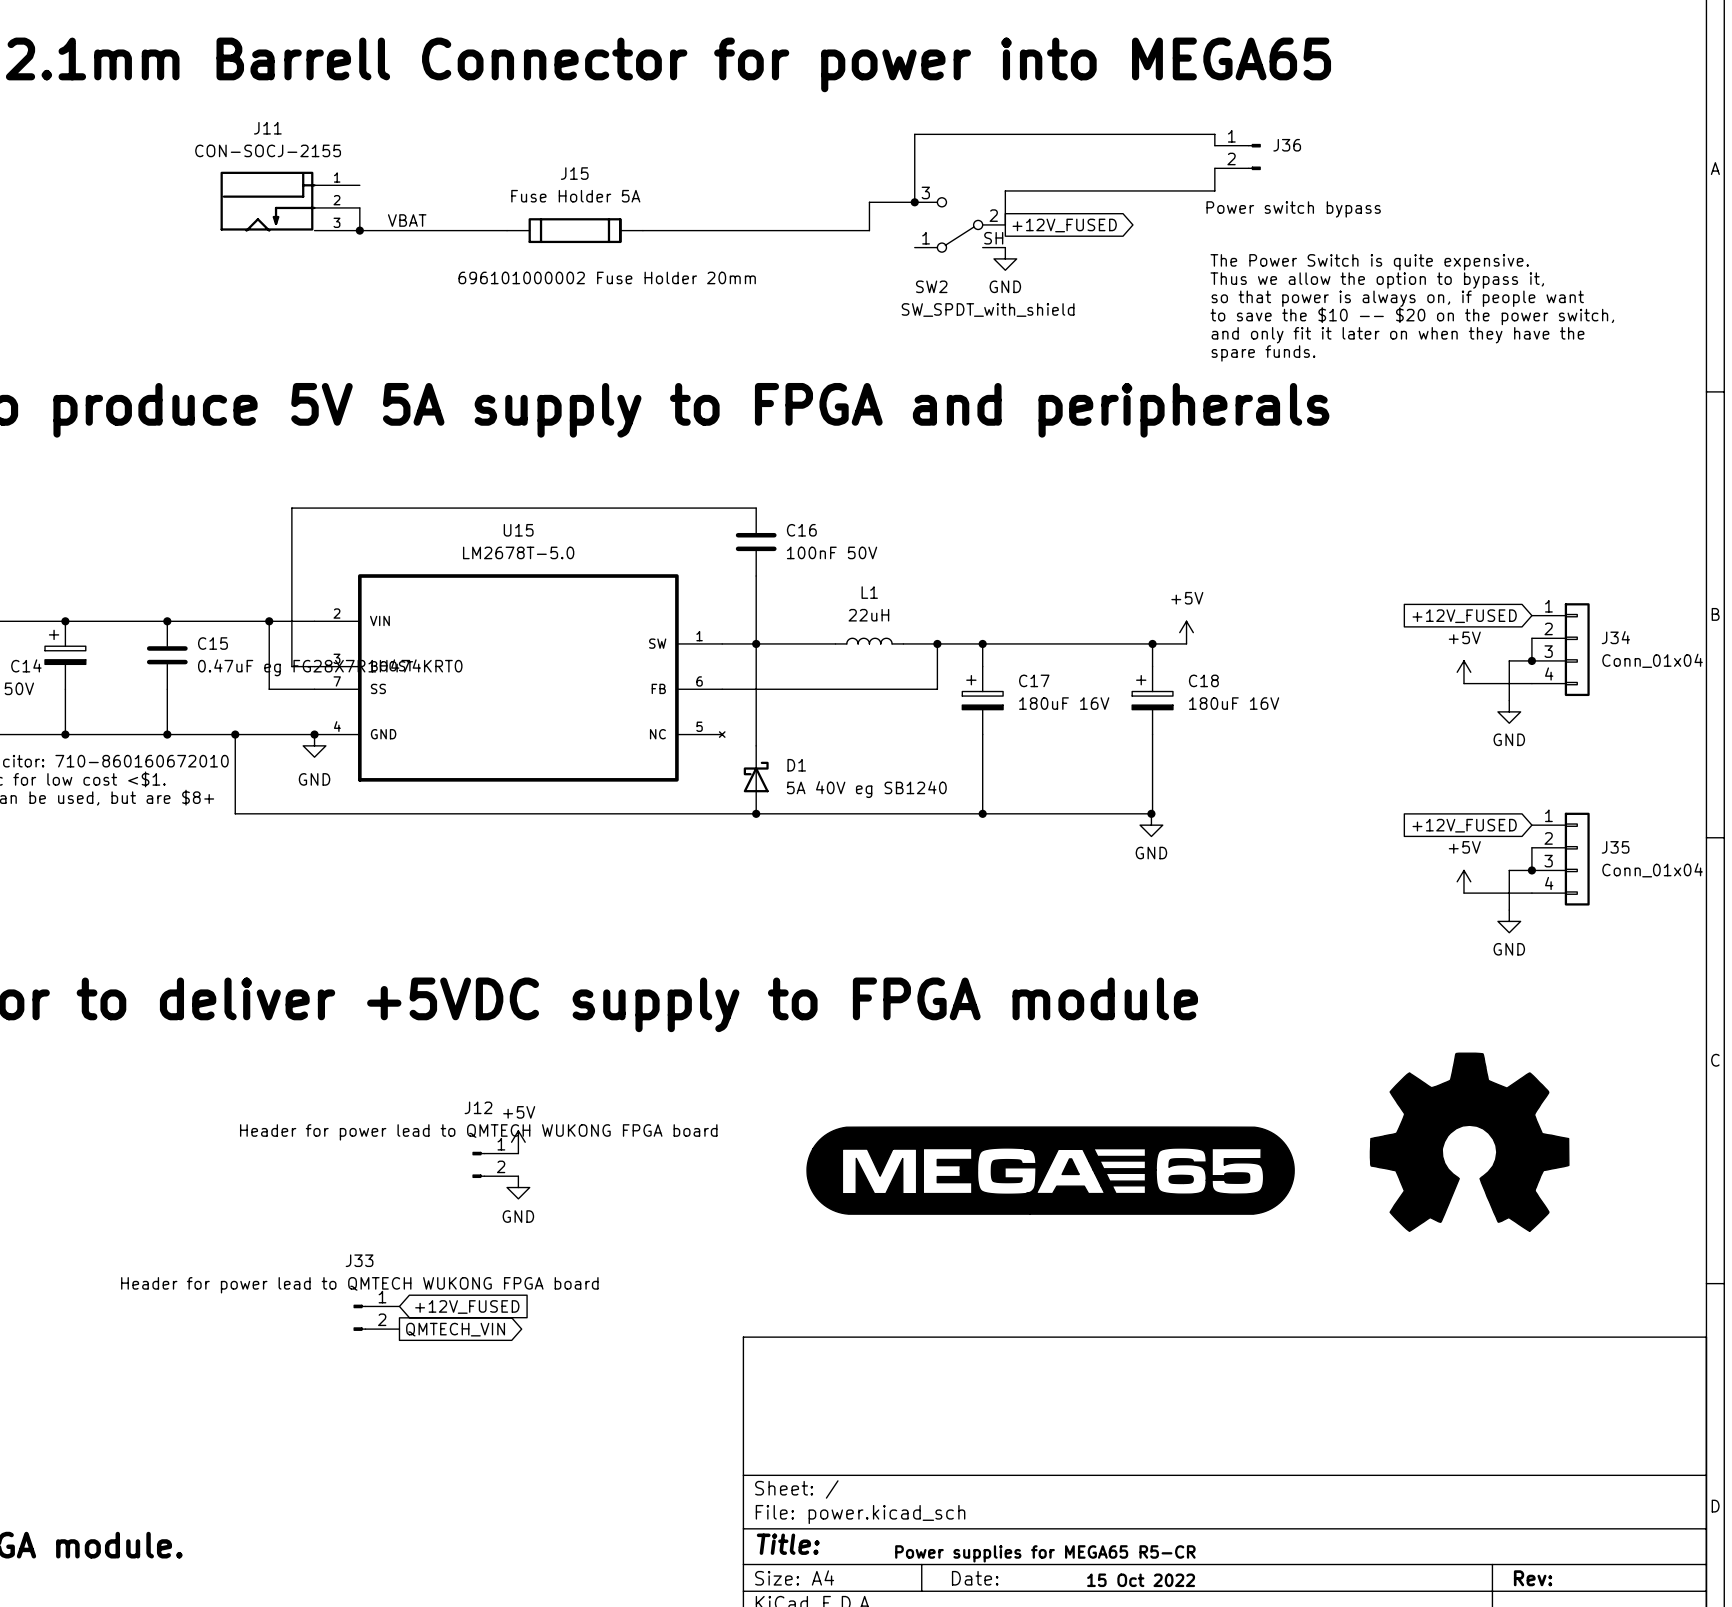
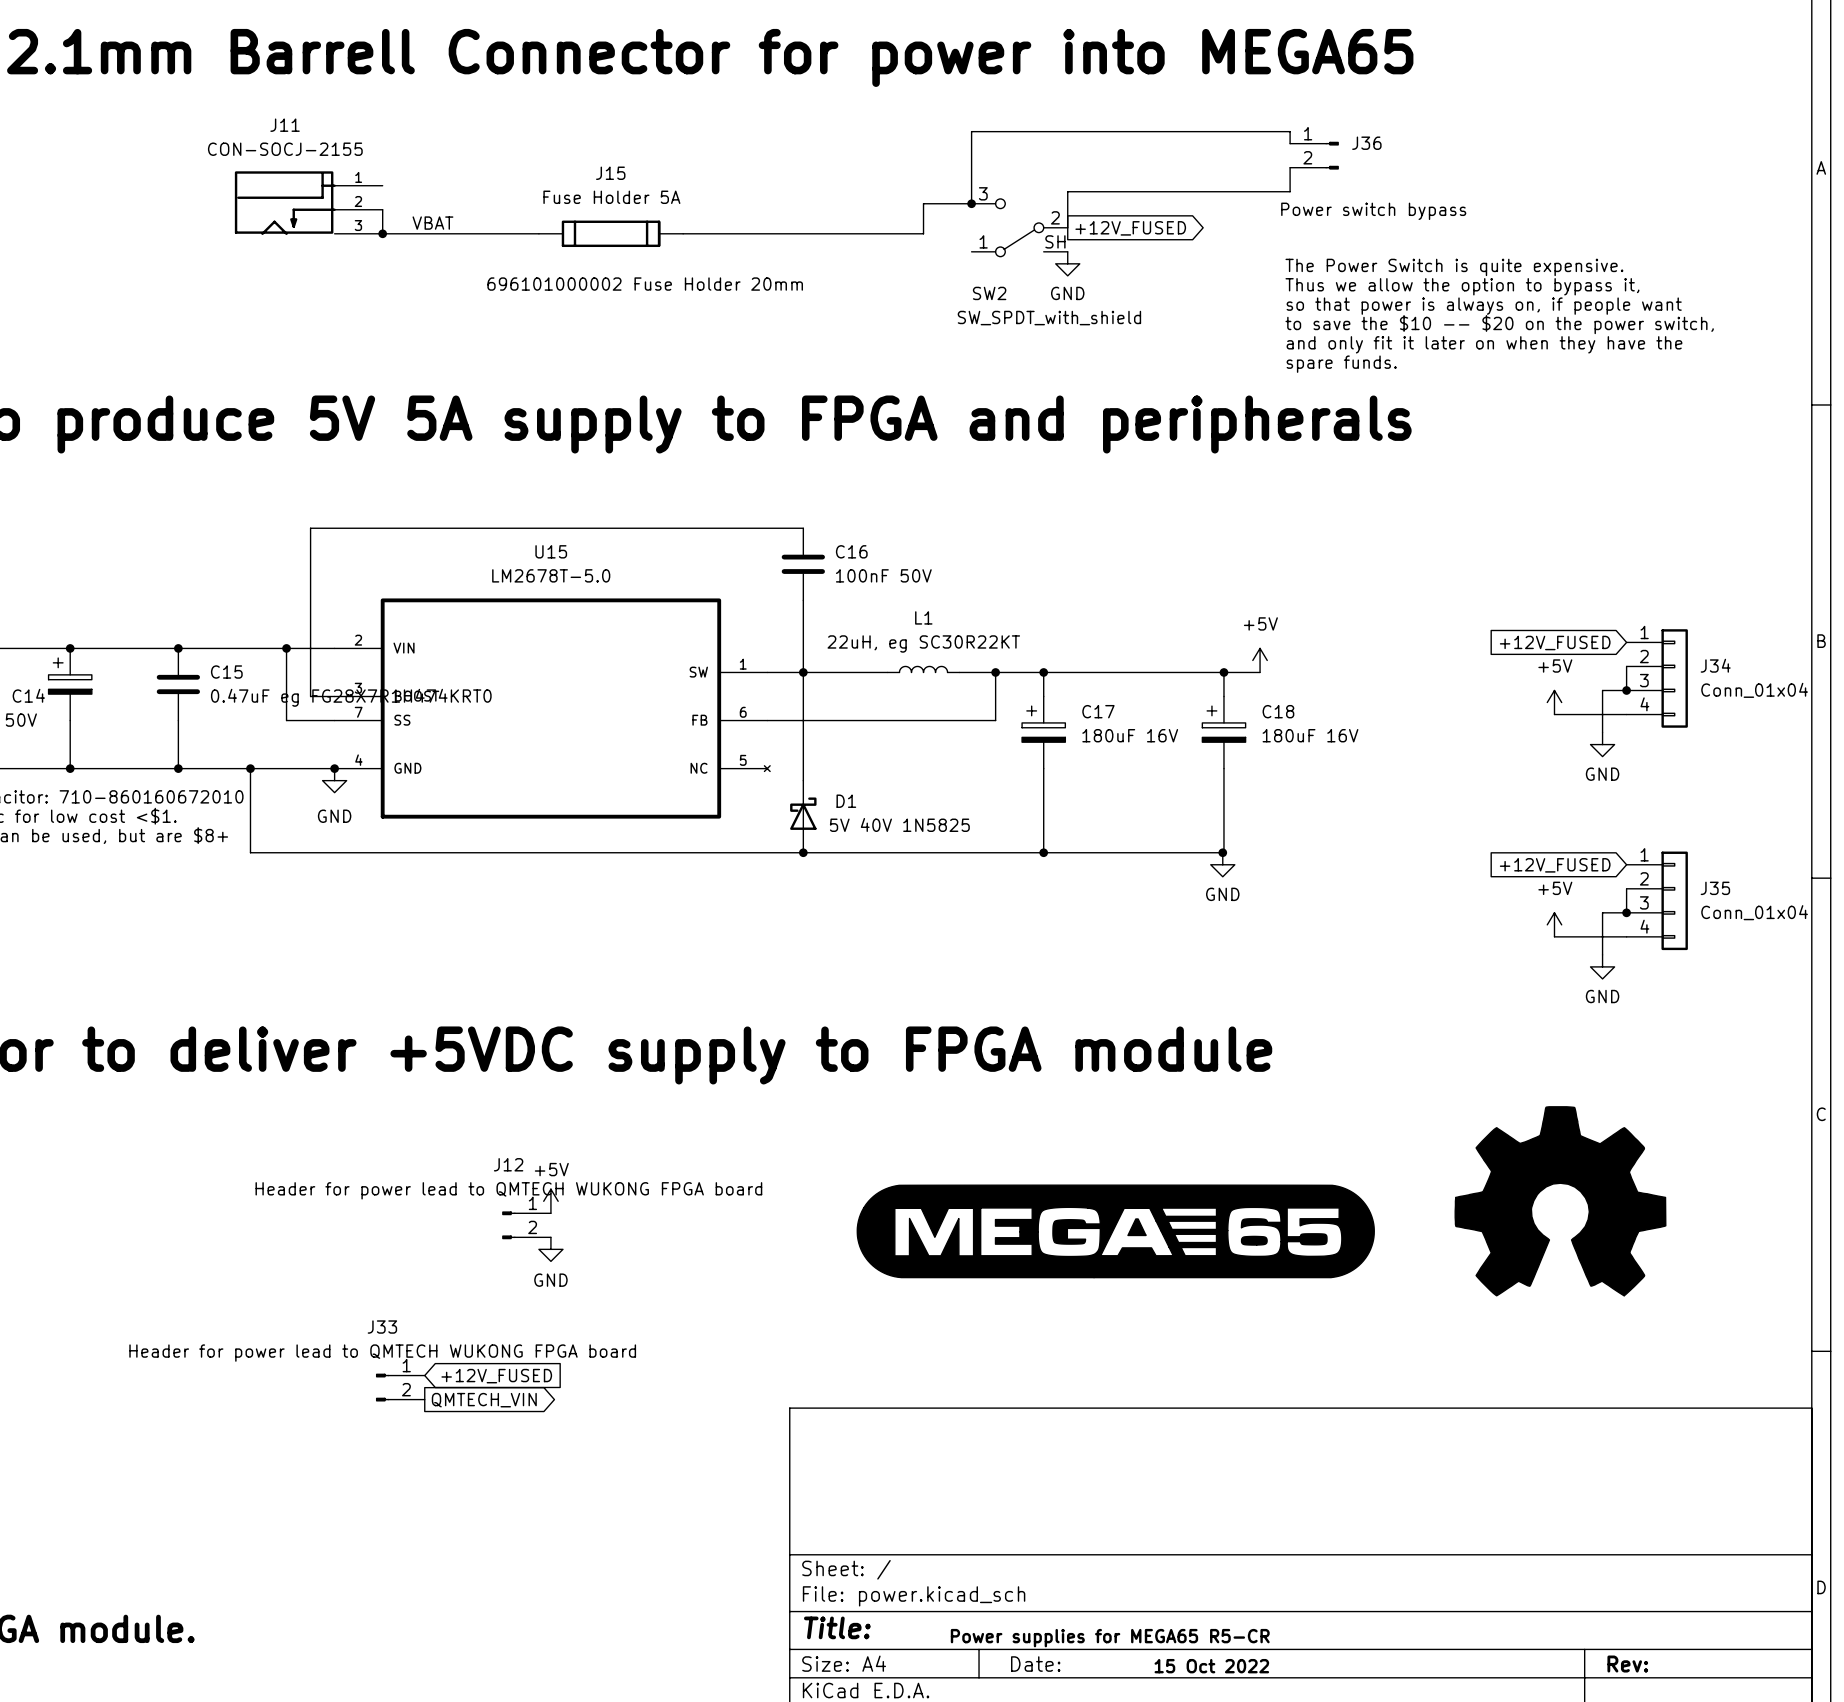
L1 value: 22uH (868, 615) -> 22uH, eg SC30R22KT (923, 643)
D1 value: 5A 40V eg SB1240 (866, 789) -> 5V 40V 1N5825 (899, 824)

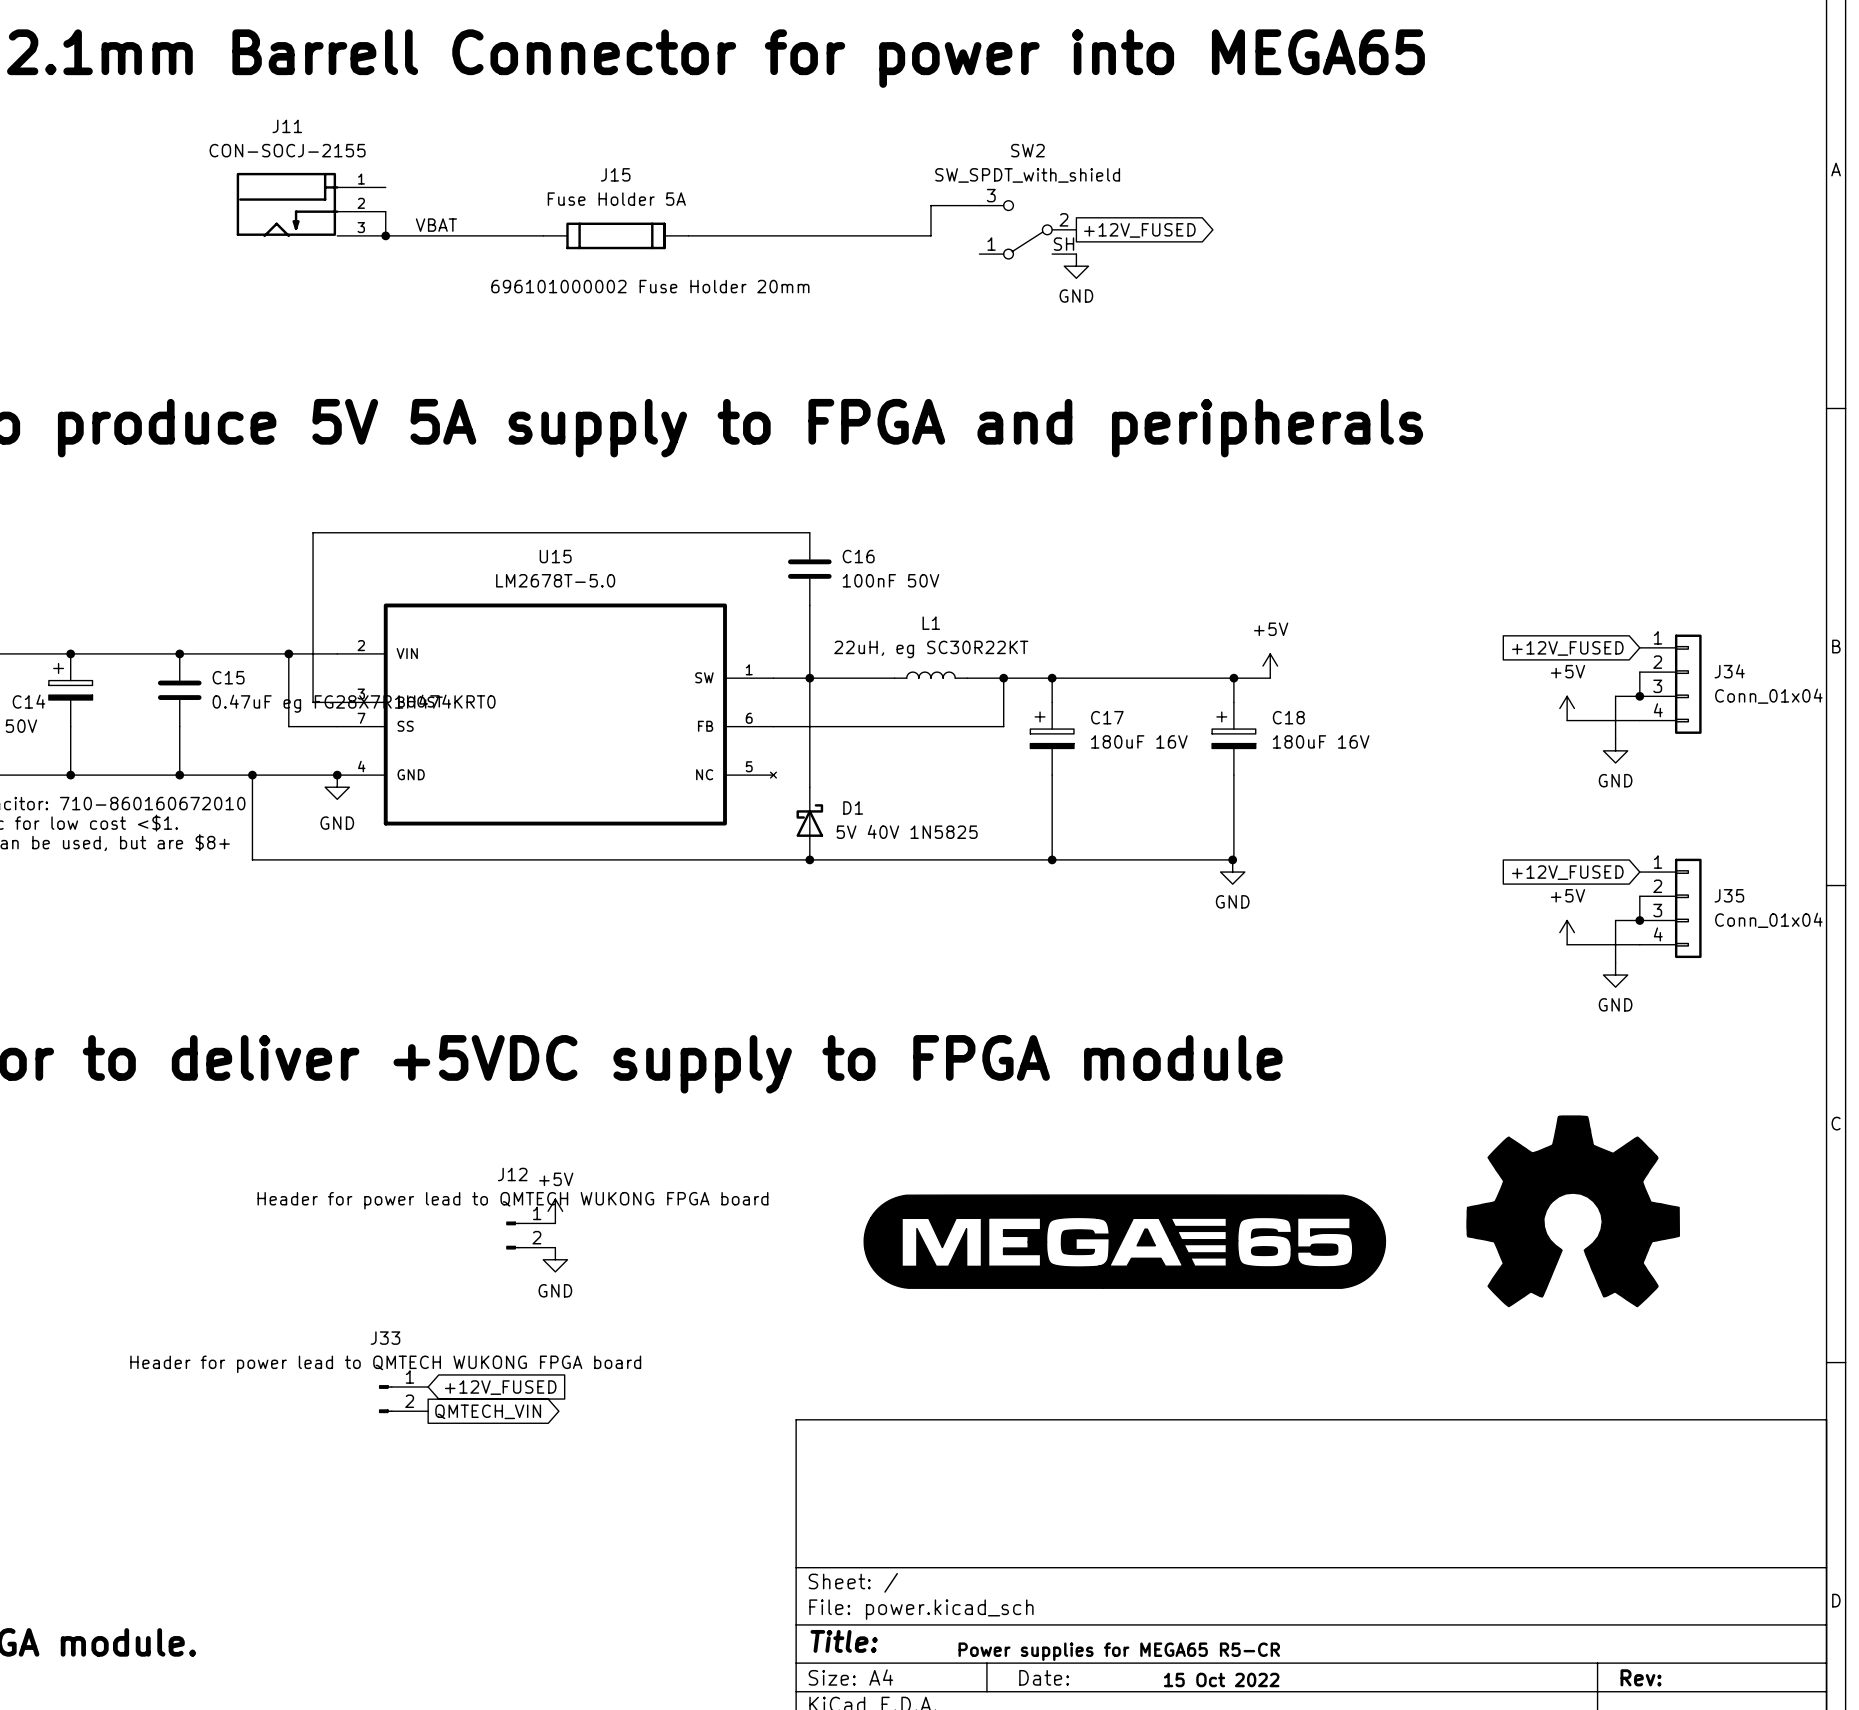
wire: (1290, 143) (1290, 131) (971, 131) (971, 203) -> none
J36: Power switch bypass (1314, 155) -> none
wire: (1290, 167) (1290, 191) (1067, 191) (1067, 227) -> none
junction: (971, 203) -> none
text: The Power Switch is quite expensive. (1454, 267) -> none
text: Thus we allow the option to bypass it, (1462, 286) -> none
SW2 name position: SW2 (989, 293) -> SW2 (1027, 150)
text: so that power is always on, if people want (1484, 306) -> none
SW2 value position: SW_SPDT_with_shield (1049, 318) -> SW_SPDT_with_shield (1027, 175)
text: to save the $10 -- $20 on the power switch, (1499, 324) -> none
text: and only fit it later on when they have the (1484, 344) -> none
text: spare funds. (1341, 364) -> none

